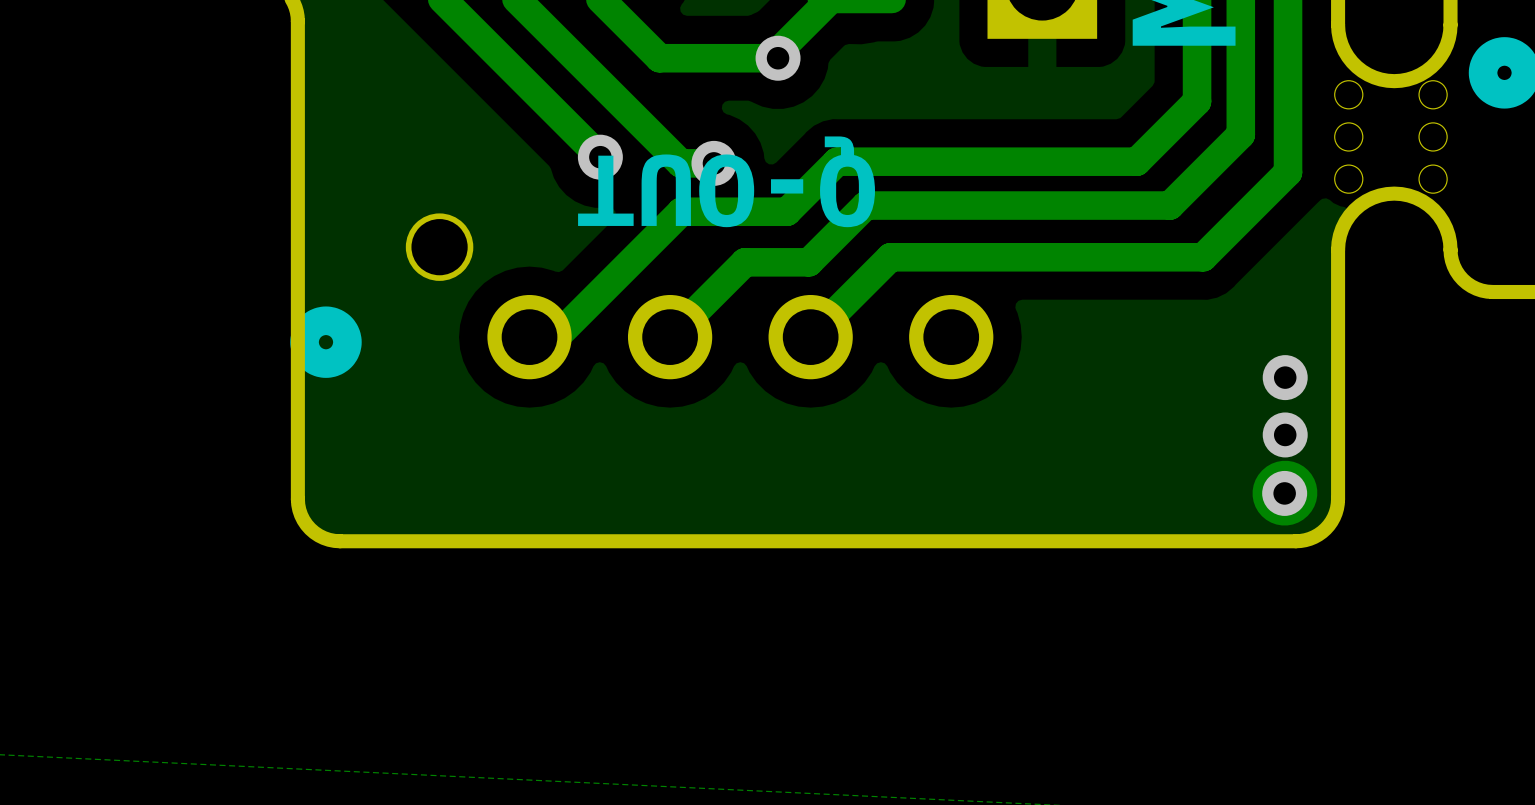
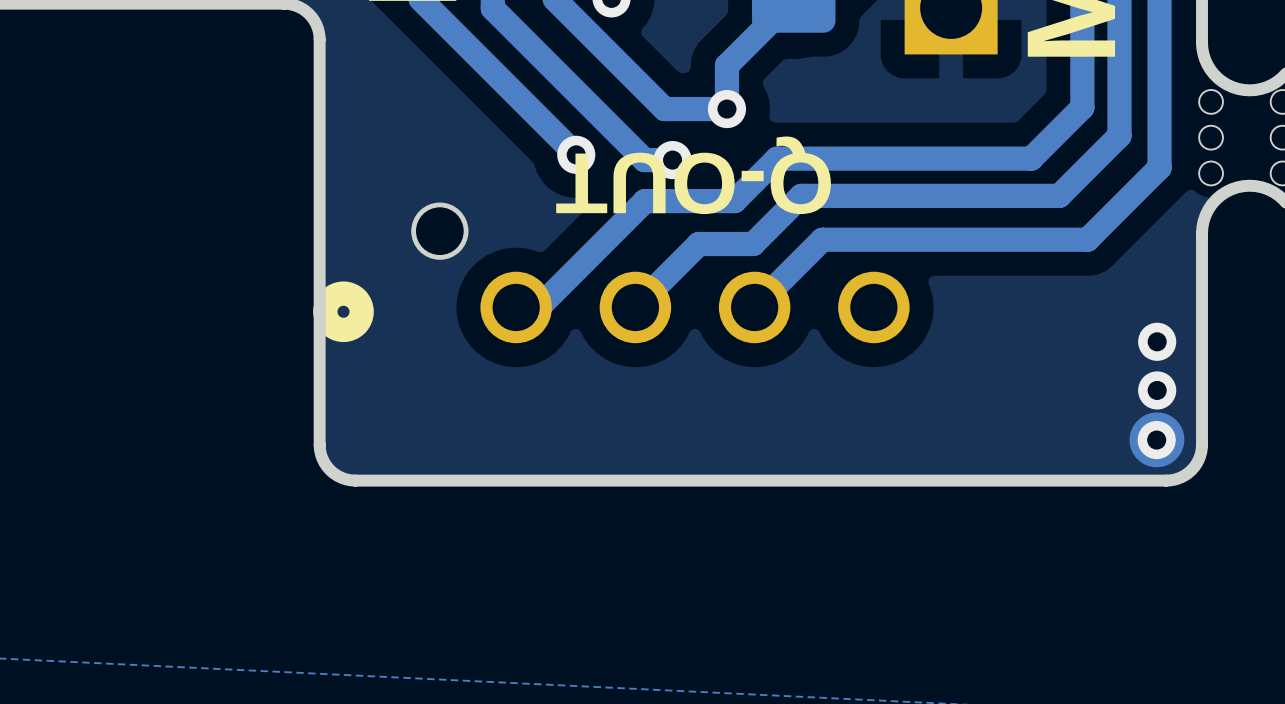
track: (778, 58) (659, 58) -> (726, 70) (726, 109) (664, 109) (626, 70)
via position: (778, 58) -> (726, 109)

